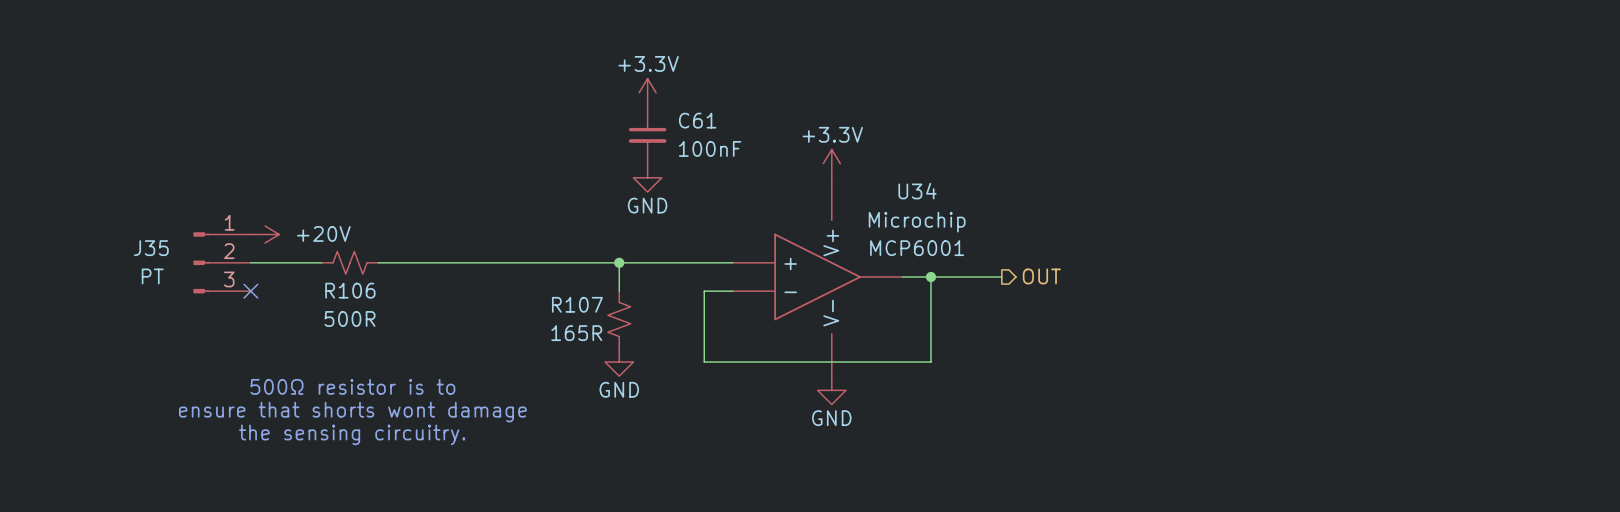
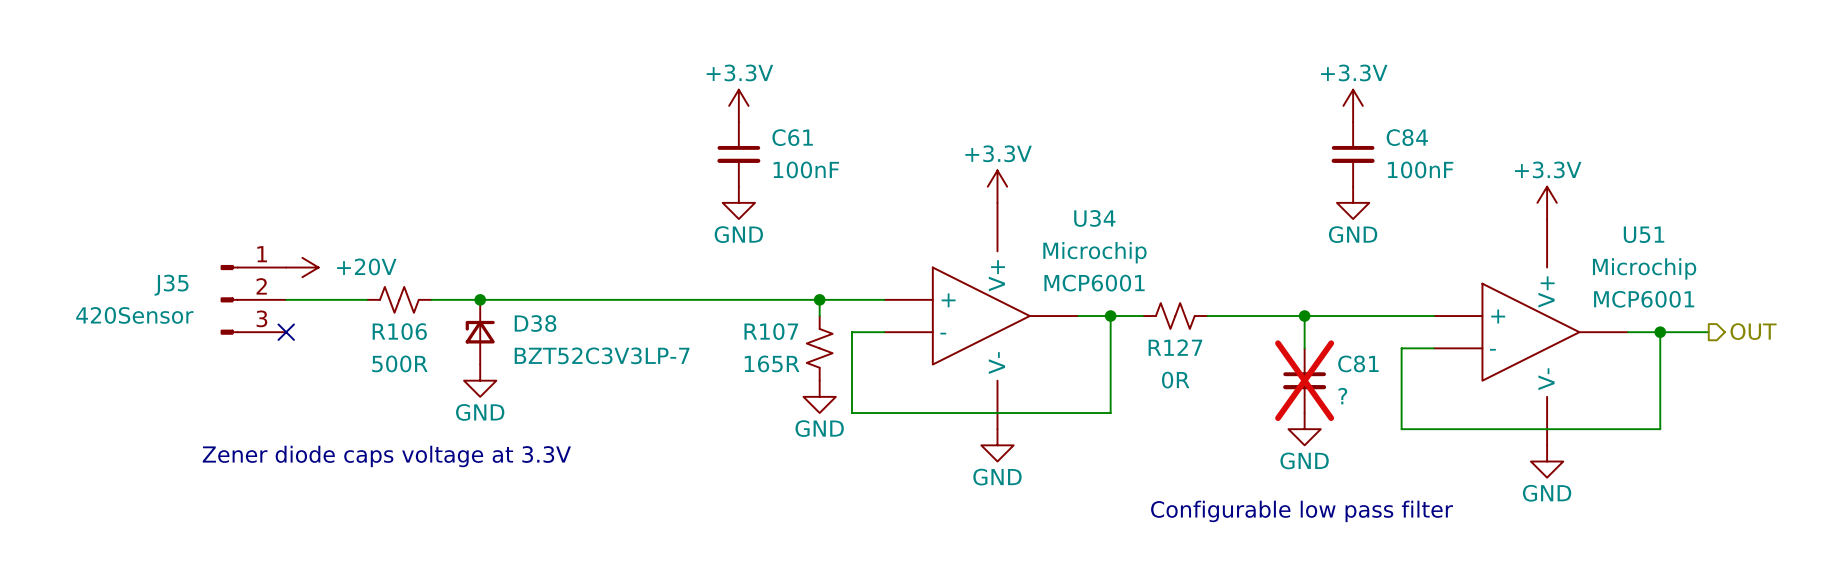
power symbol: none -> +3.3V (1353, 105)
C84: none -> 100nF (1353, 154)
power symbol position: +3.3V (831, 163) -> +3.3V (997, 186)
power symbol: none -> GND (1353, 202)
power symbol: none -> +3.3V (1547, 202)
junction: none -> (480, 299)
wire: (619, 262) (619, 291) -> none
junction: (619, 262) -> none
wire: none -> (819, 299) (819, 316)
junction: none -> (819, 299)
J35 value: PT (152, 276) -> 420Sensor (134, 315)
U34 position: (817, 276) -> (981, 316)
wire: (930, 276) (930, 362) -> (1110, 316) (1110, 413) (1062, 413)
junction position: (930, 276) -> (1110, 316)
R127: none -> 0R (1175, 316)
hierarchical label: OUT (1041, 276) -> none
wire: none -> (1207, 316) (1433, 316)
wire: none -> (1304, 316) (1304, 348)
junction: none -> (1304, 316)
hierarchical label: none -> OUT (1753, 331)
D38: none -> BZT52C3V3LP-7 (480, 332)
wire: (732, 291) (704, 291) (704, 362) (746, 362) -> (884, 332) (852, 332) (852, 413)
U51: none -> (1530, 332)
wire: none -> (1627, 332) (1708, 332)
wire: none -> (1660, 332) (1660, 429) (1401, 429) (1401, 348) (1433, 348)
junction: none -> (1660, 332)
R107 position: (619, 319) -> (819, 348)
power symbol: none -> GND (480, 380)
C81: none -> ? (1304, 380)
power symbol: none -> GND (819, 396)
power symbol: GND (619, 362) -> none
power symbol: none -> GND (1304, 429)
text: 500Ω resistor is to (352, 386) -> none
power symbol position: GND (831, 390) -> GND (997, 445)
text: none -> Zener diode caps voltage at 3.3V (386, 456)
power symbol: none -> GND (1547, 461)
text: ensure that shorts wont damage (352, 412) -> none
text: the sensing circuitry. (352, 434) -> none
text: none -> Configurable low pass filter (1302, 511)

